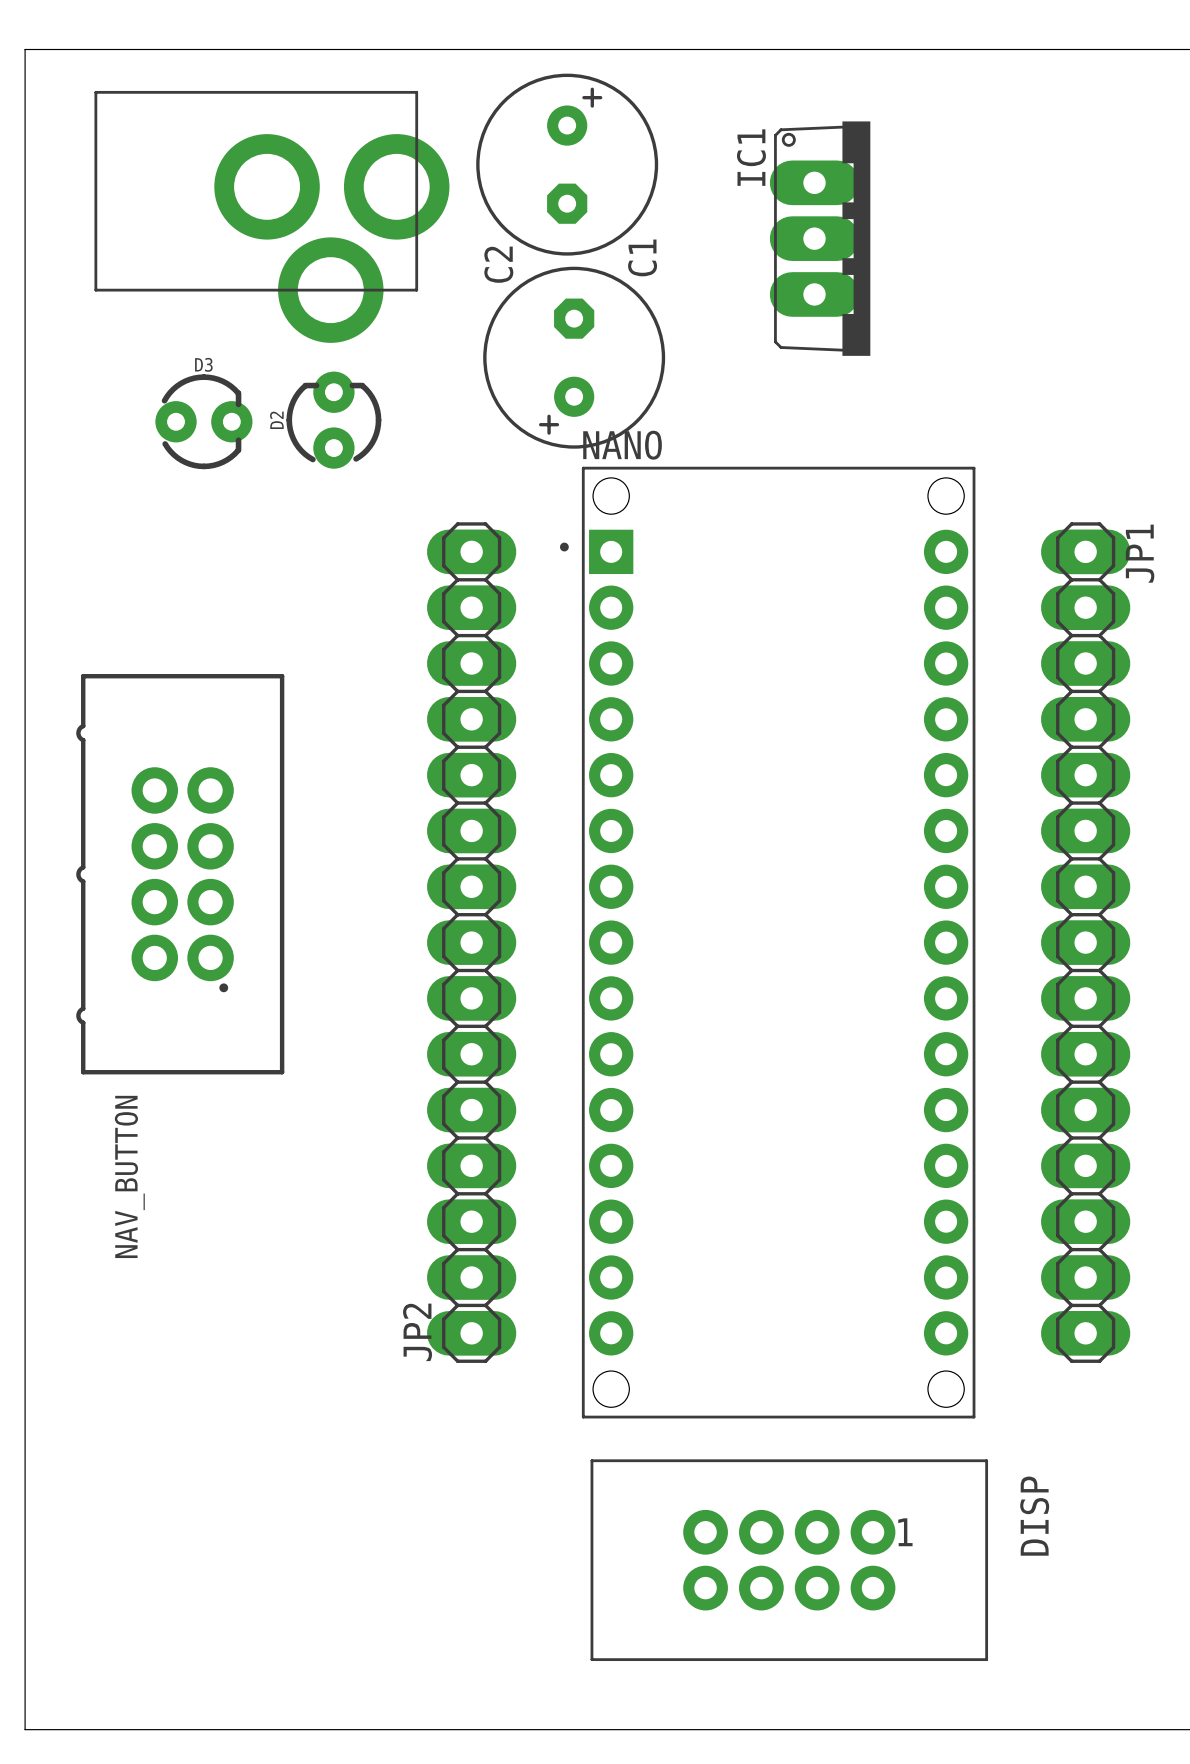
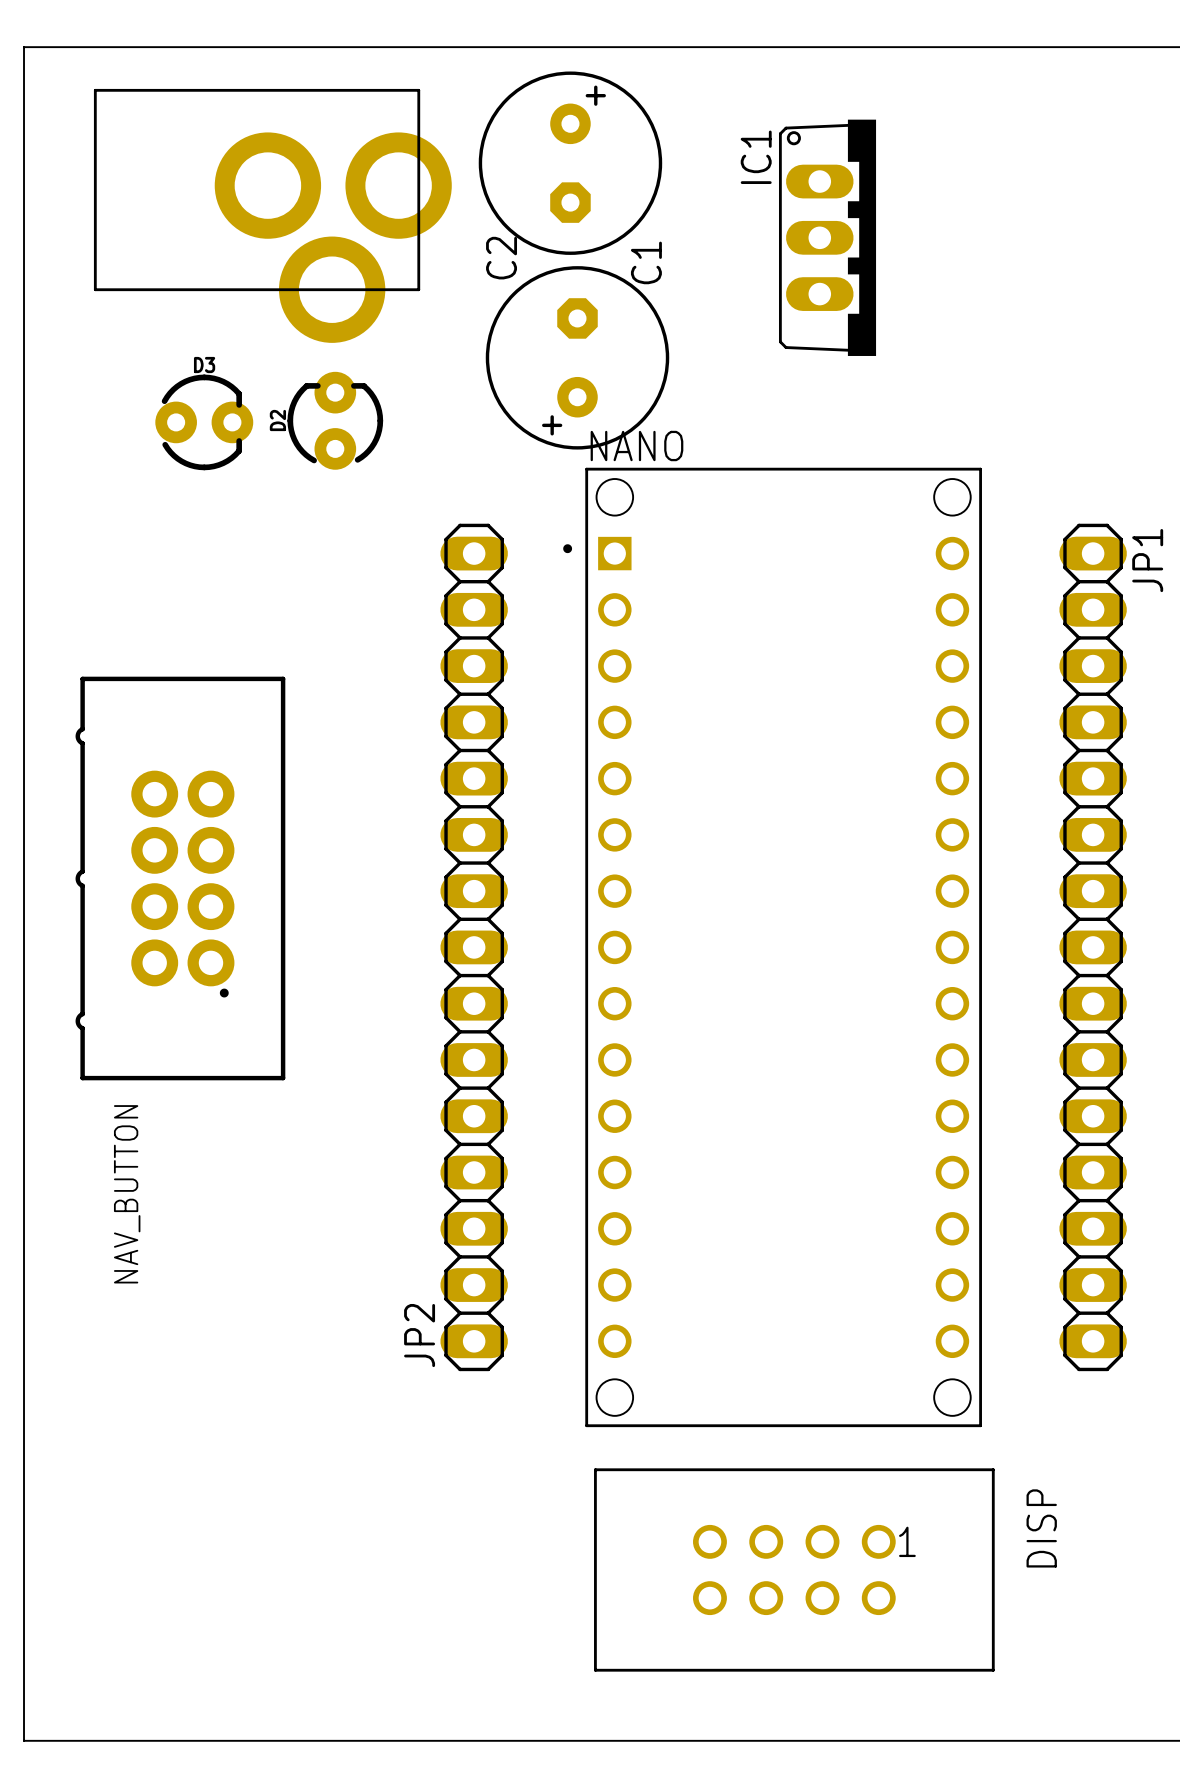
IC1 footprint: [769, 121, 871, 356] -> [778, 119, 877, 356]
NANO footprint: [559, 466, 976, 1419] -> [563, 467, 982, 1428]
JP2 footprint: [426, 522, 517, 1363] -> [440, 523, 508, 1372]
JP1 footprint: [1041, 522, 1131, 1363] -> [1059, 523, 1127, 1372]
DISP footprint: [590, 1459, 989, 1662] -> [594, 1468, 995, 1672]

